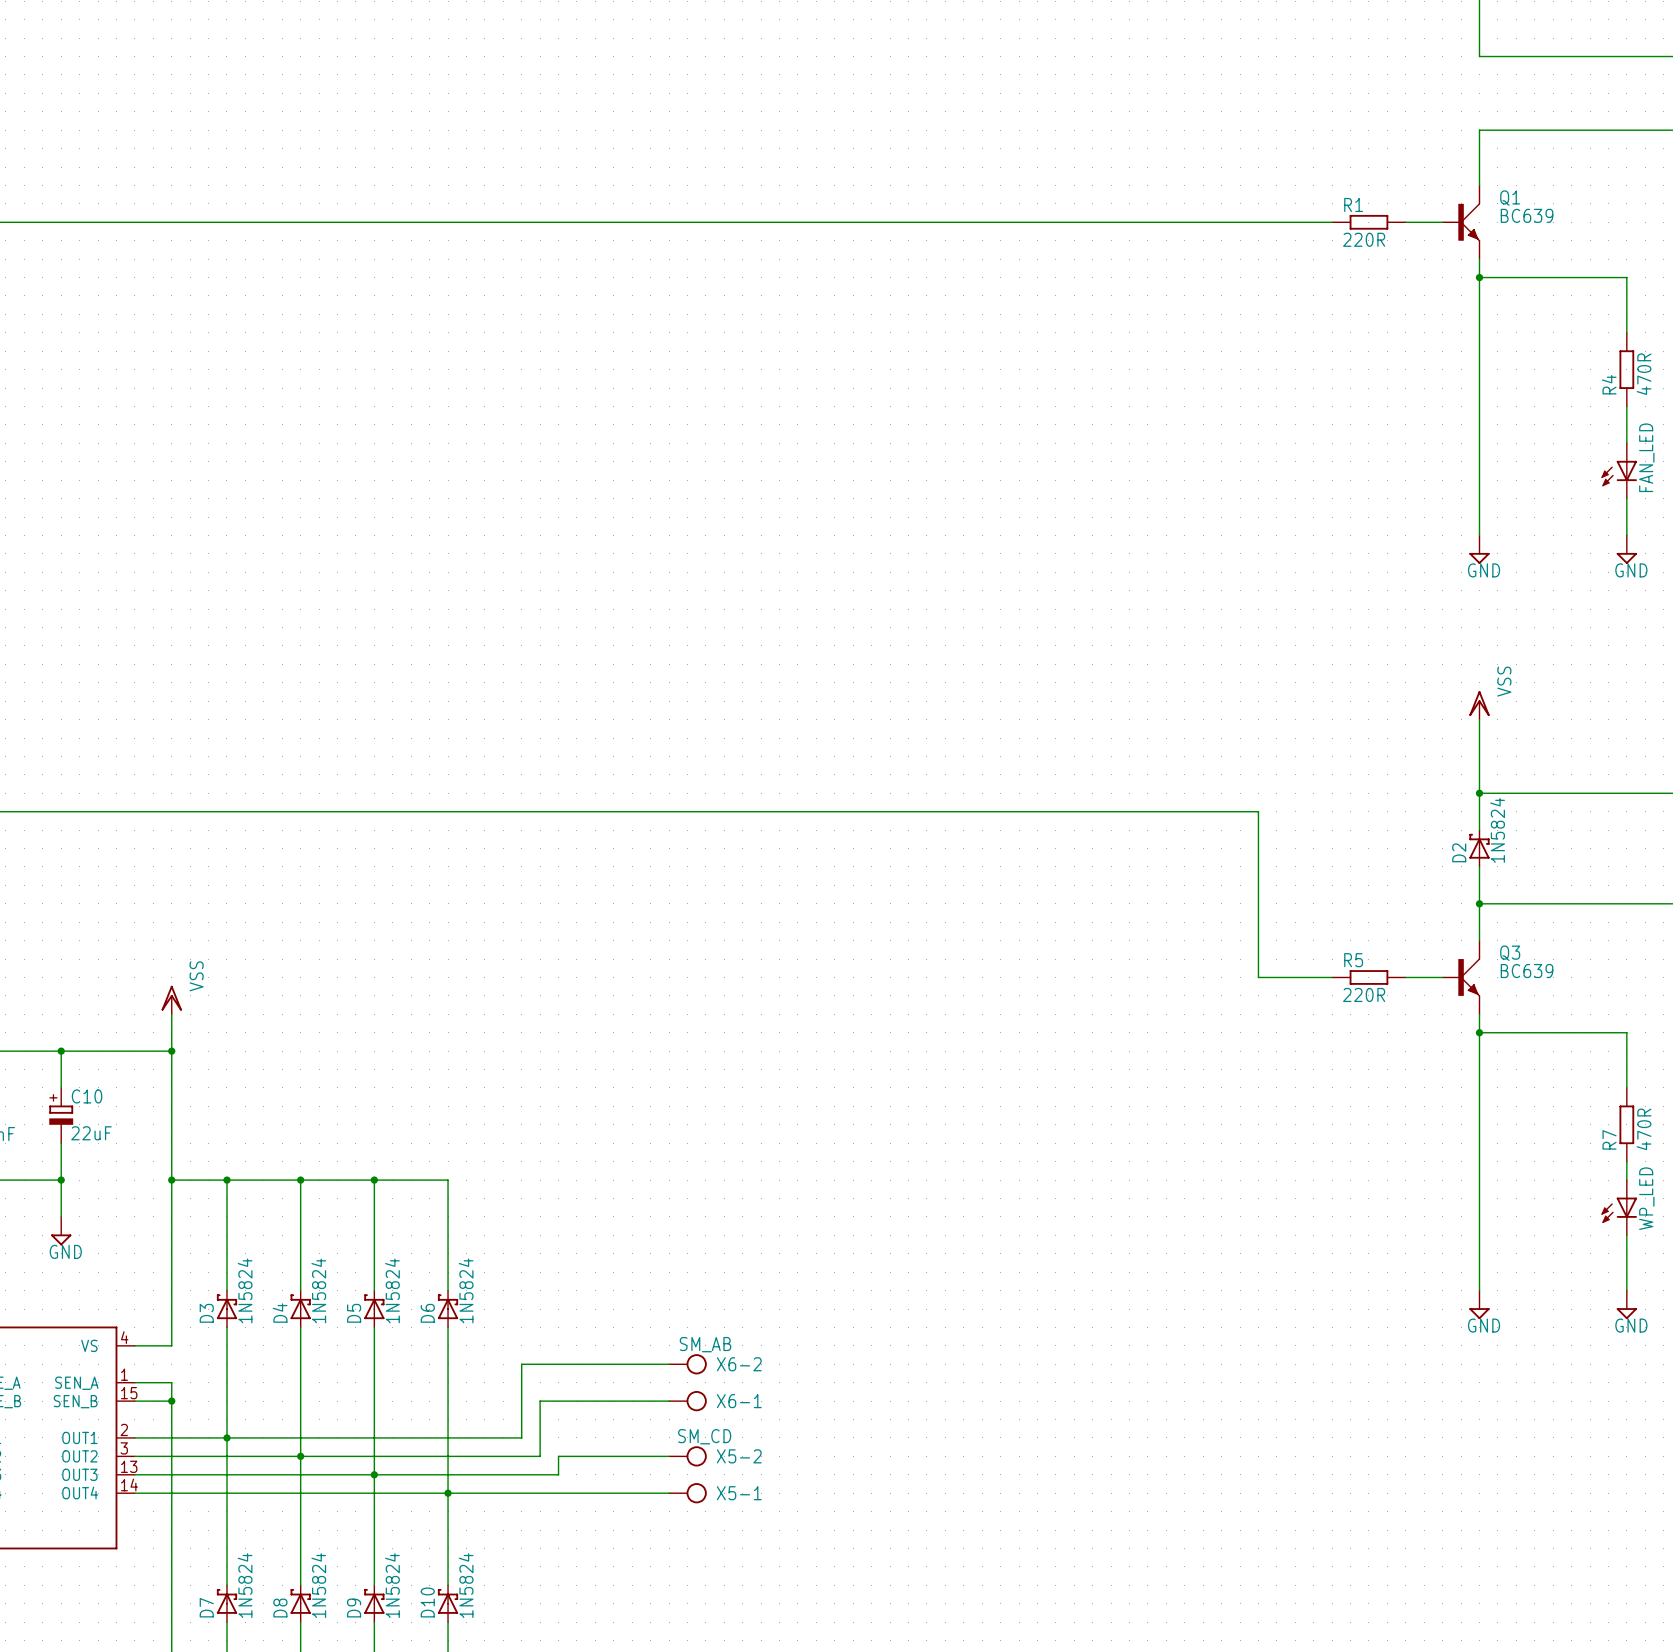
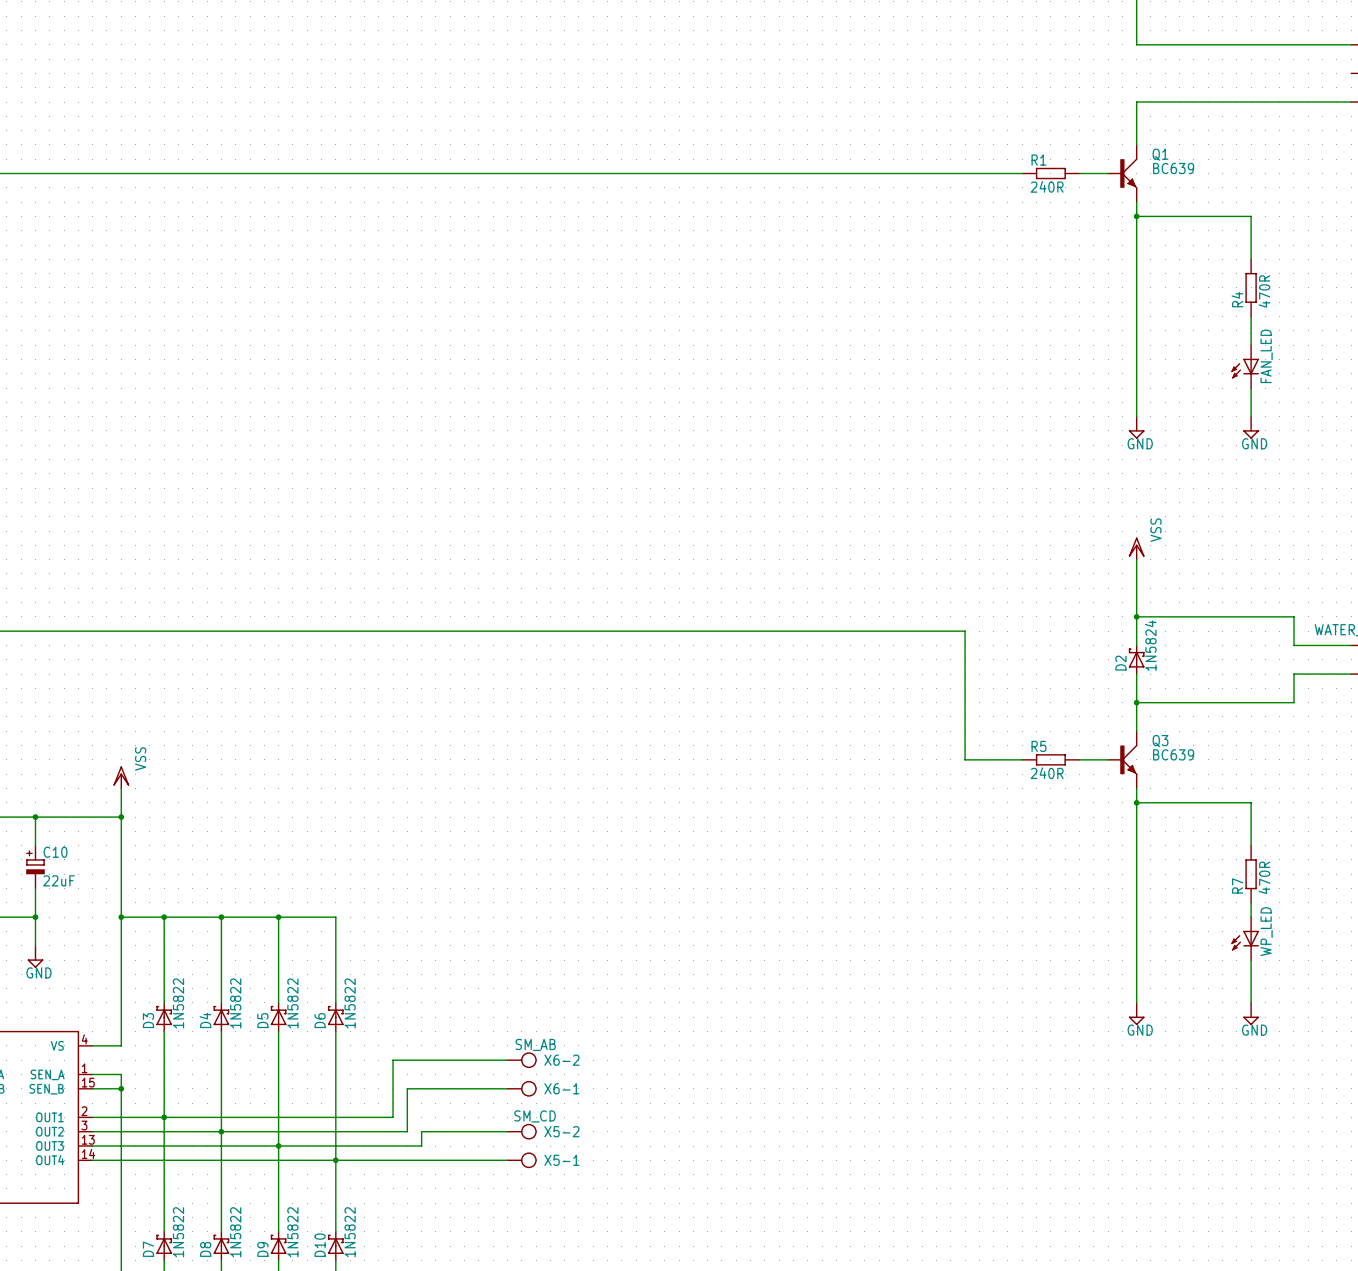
R1 value: 220R (1364, 239) -> 240R (1047, 186)
R5 value: 220R (1364, 994) -> 240R (1047, 773)
D3 value: 1N5824 (245, 1290) -> 1N5822 (178, 1003)
D4 value: 1N5824 (318, 1290) -> 1N5822 (235, 1003)
D5 value: 1N5824 (392, 1290) -> 1N5822 (292, 1003)
D6 value: 1N5824 (466, 1290) -> 1N5822 (350, 1003)
D7 value: 1N5824 (245, 1585) -> 1N5822 (178, 1232)
D8 value: 1N5824 (318, 1585) -> 1N5822 (235, 1232)
D9 value: 1N5824 (392, 1585) -> 1N5822 (292, 1232)
D10 value: 1N5824 (466, 1585) -> 1N5822 (350, 1232)

